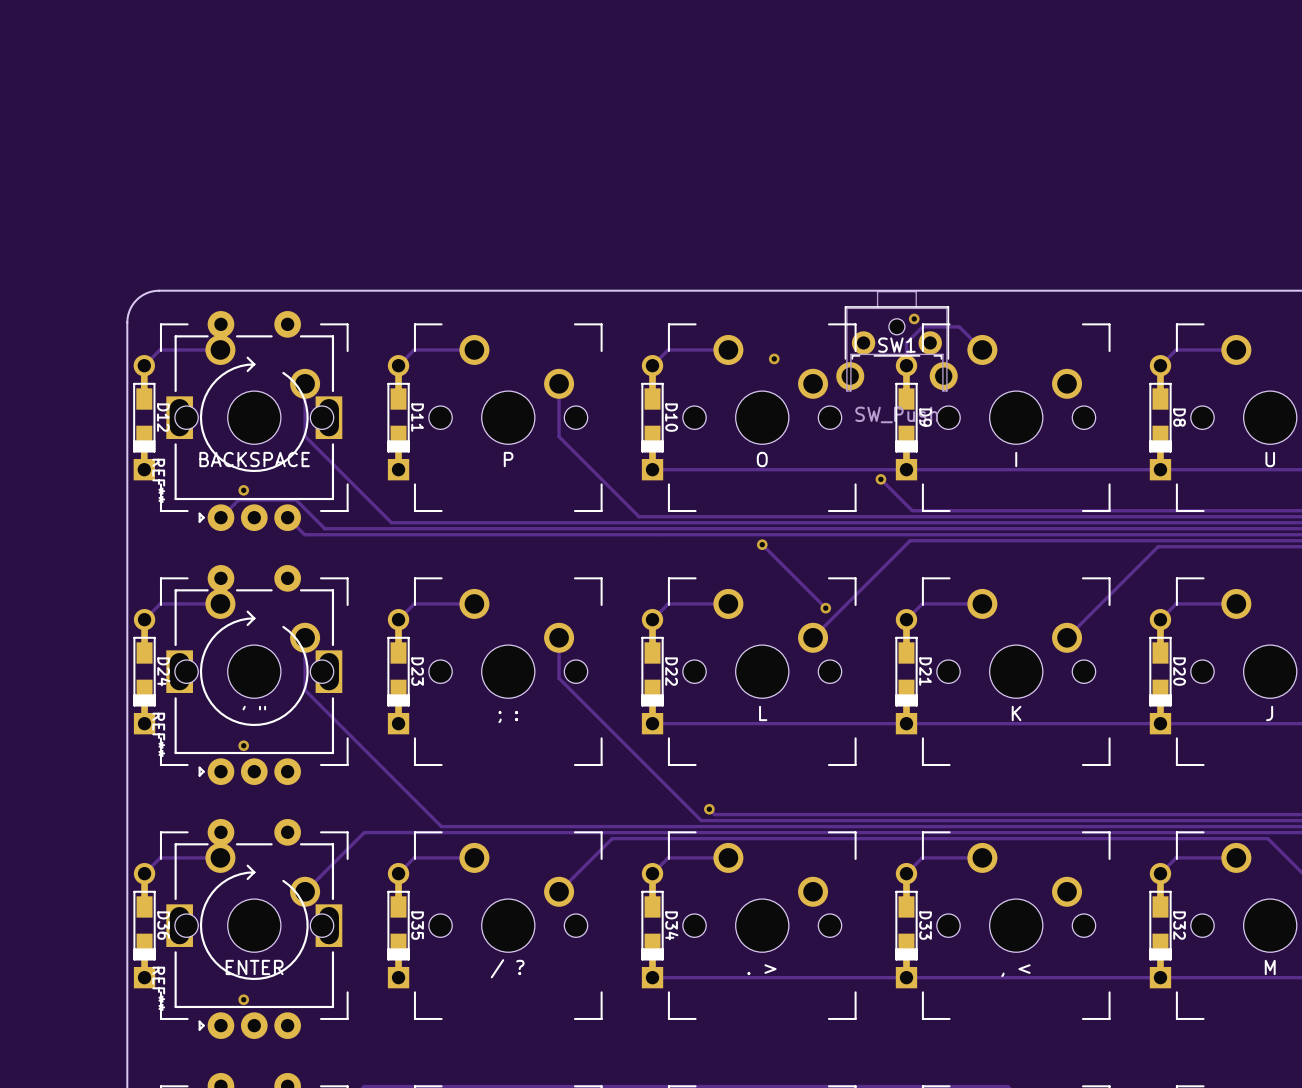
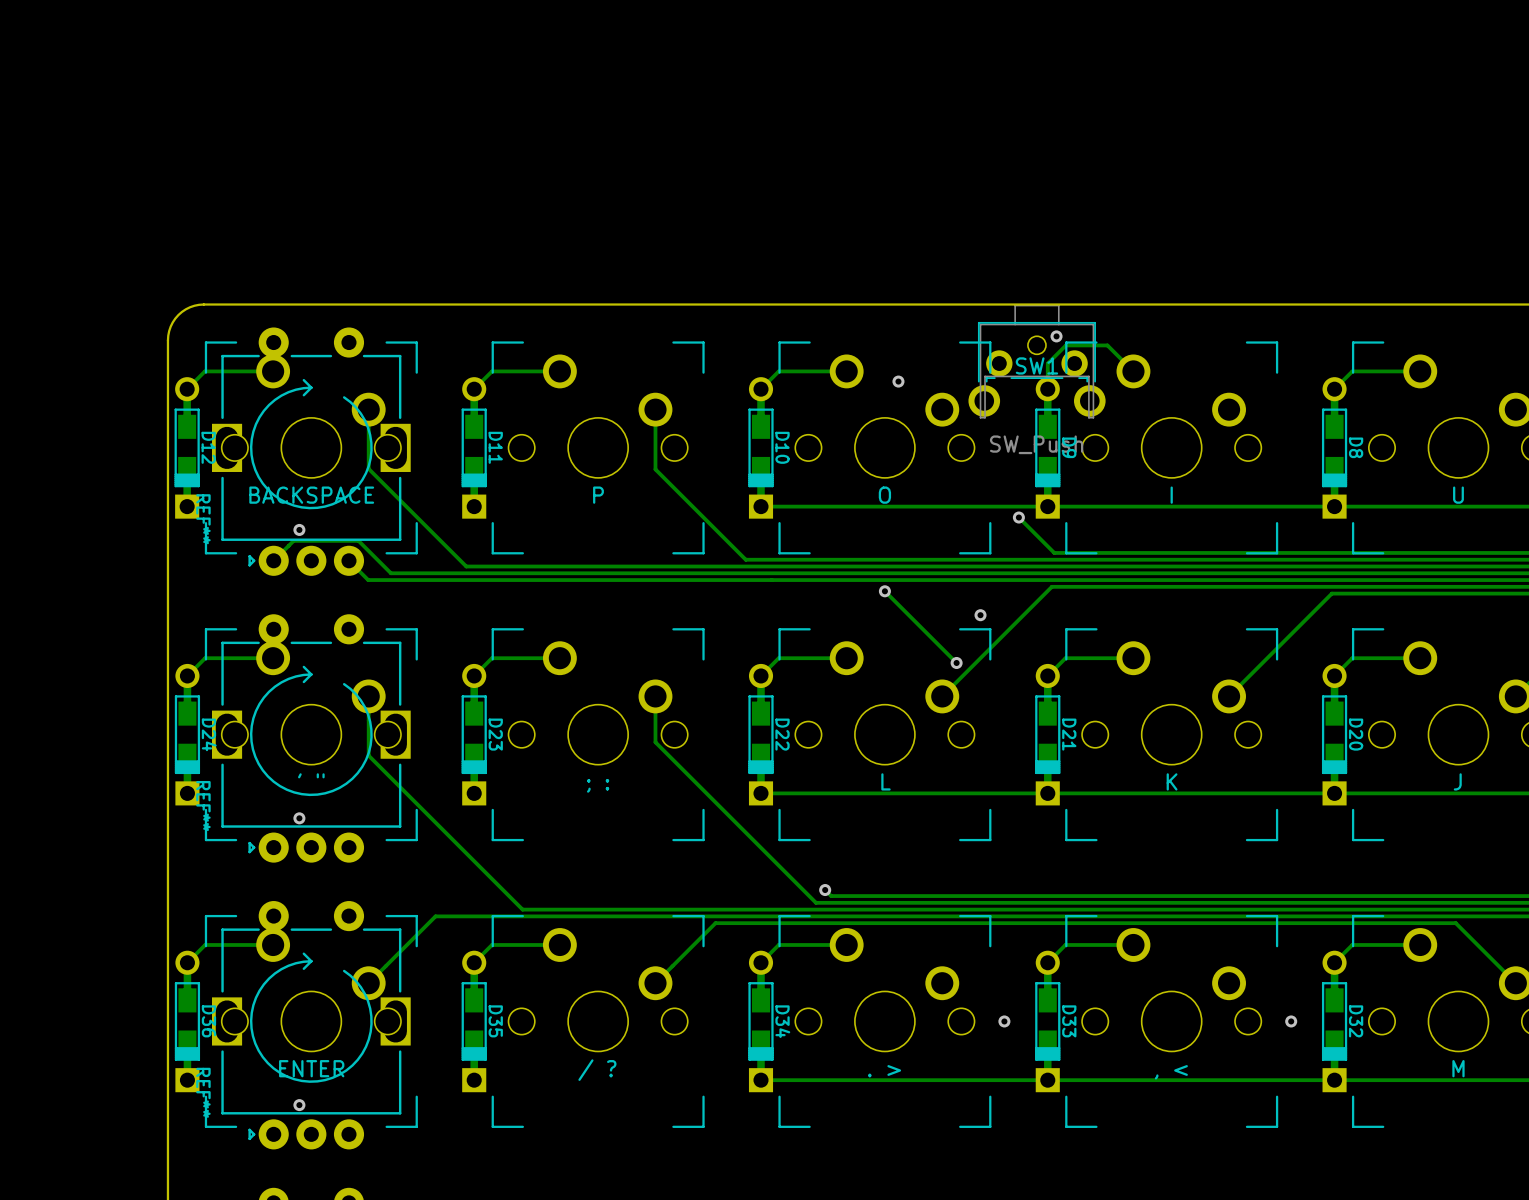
via: none -> (980, 615)
via: none -> (1004, 1021)
via: none -> (1291, 1021)

